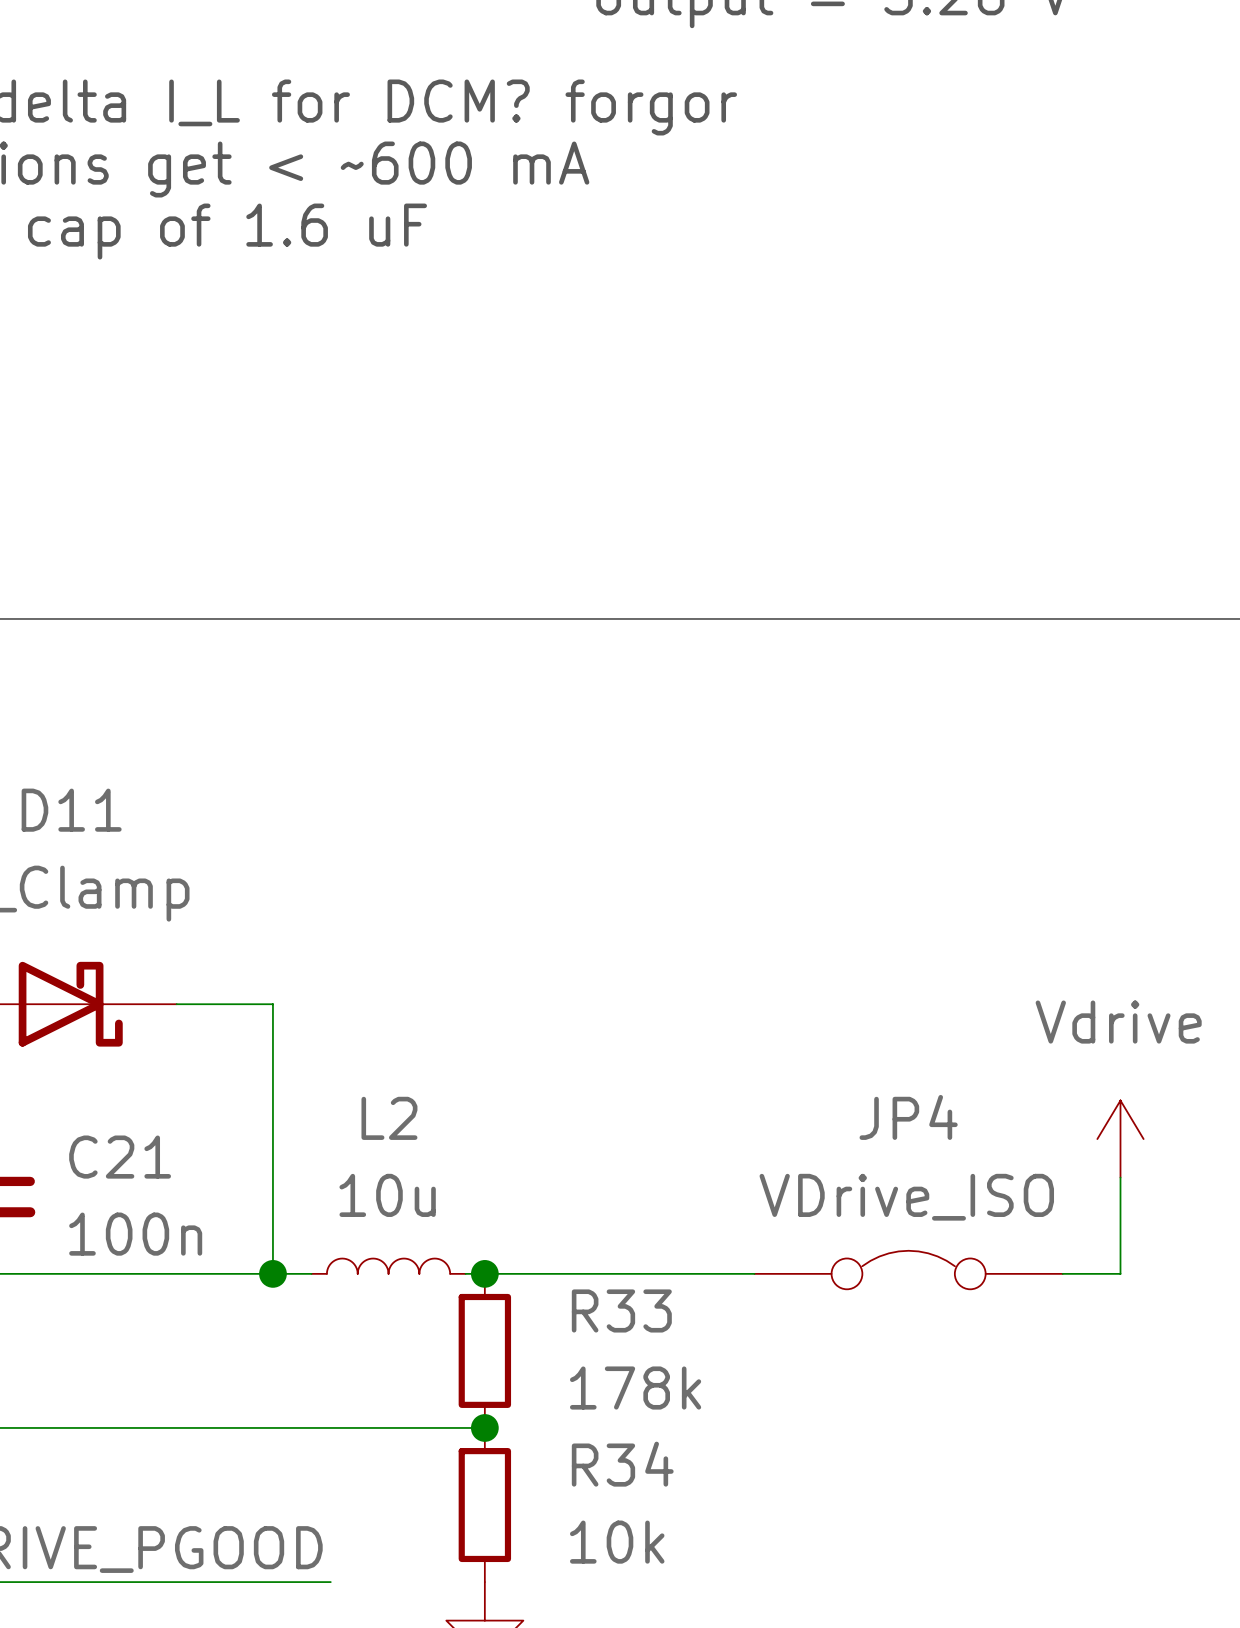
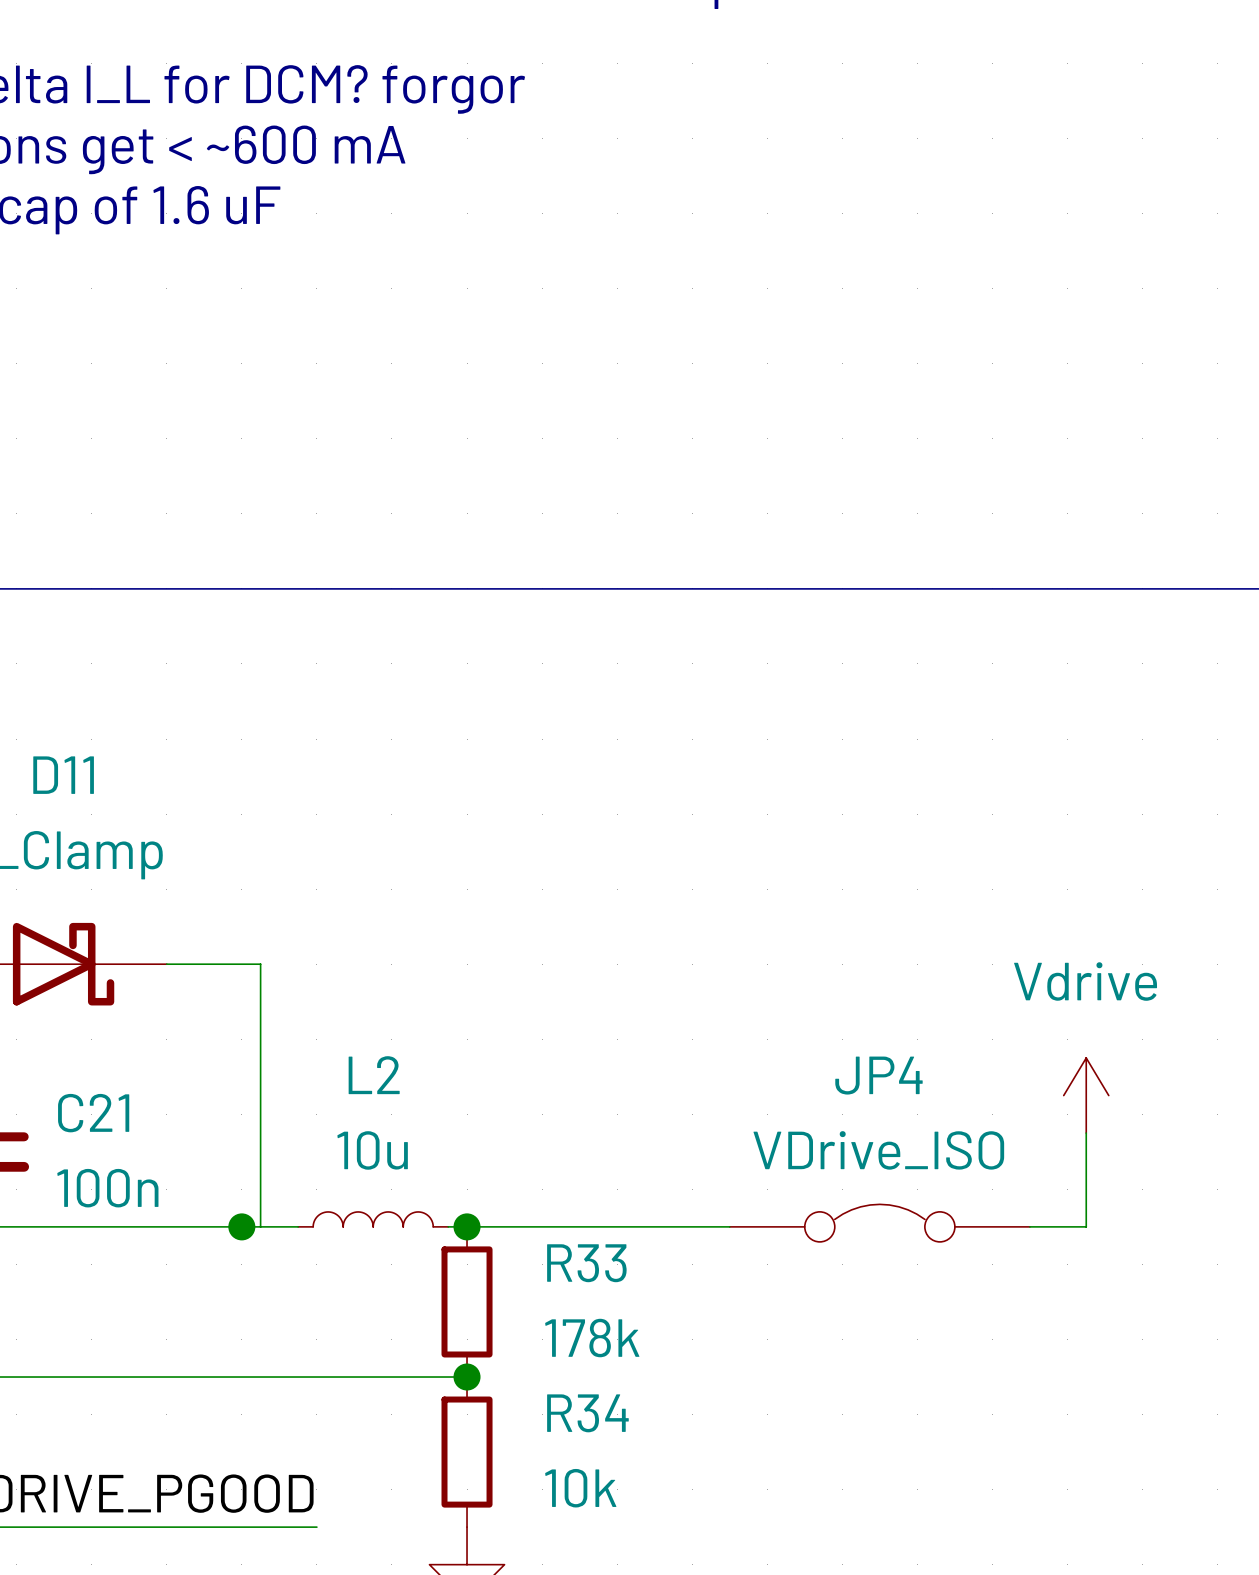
junction position: (272, 1273) -> (241, 1226)

